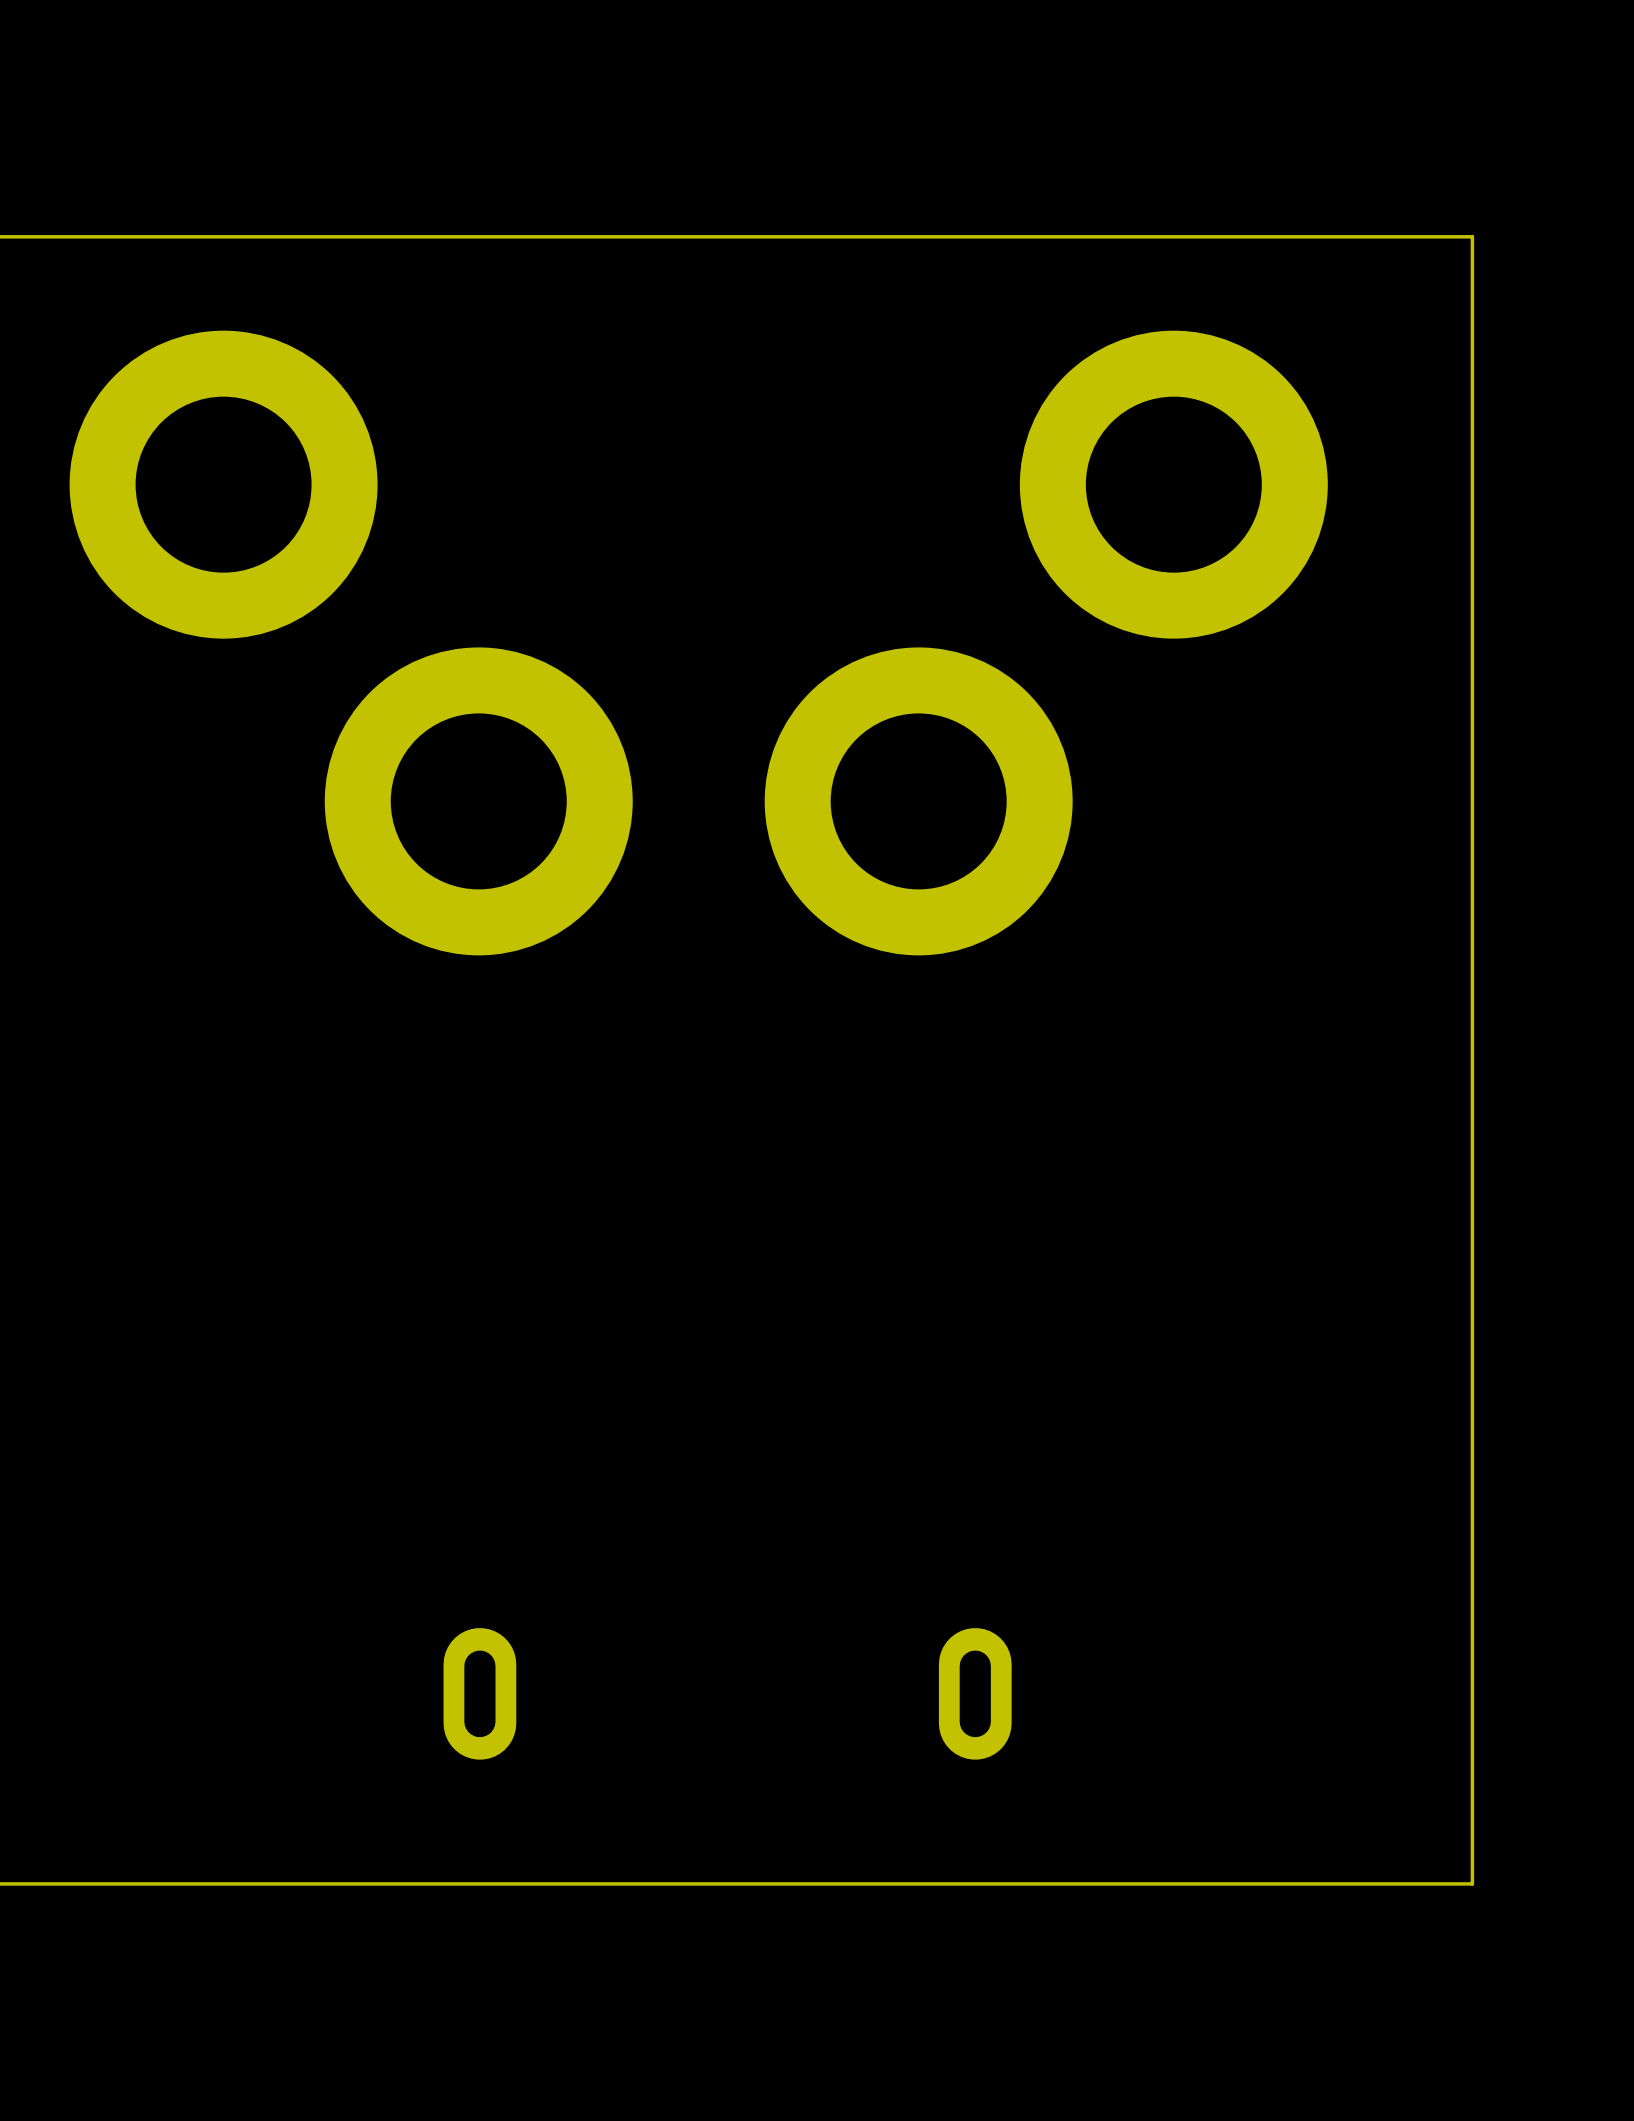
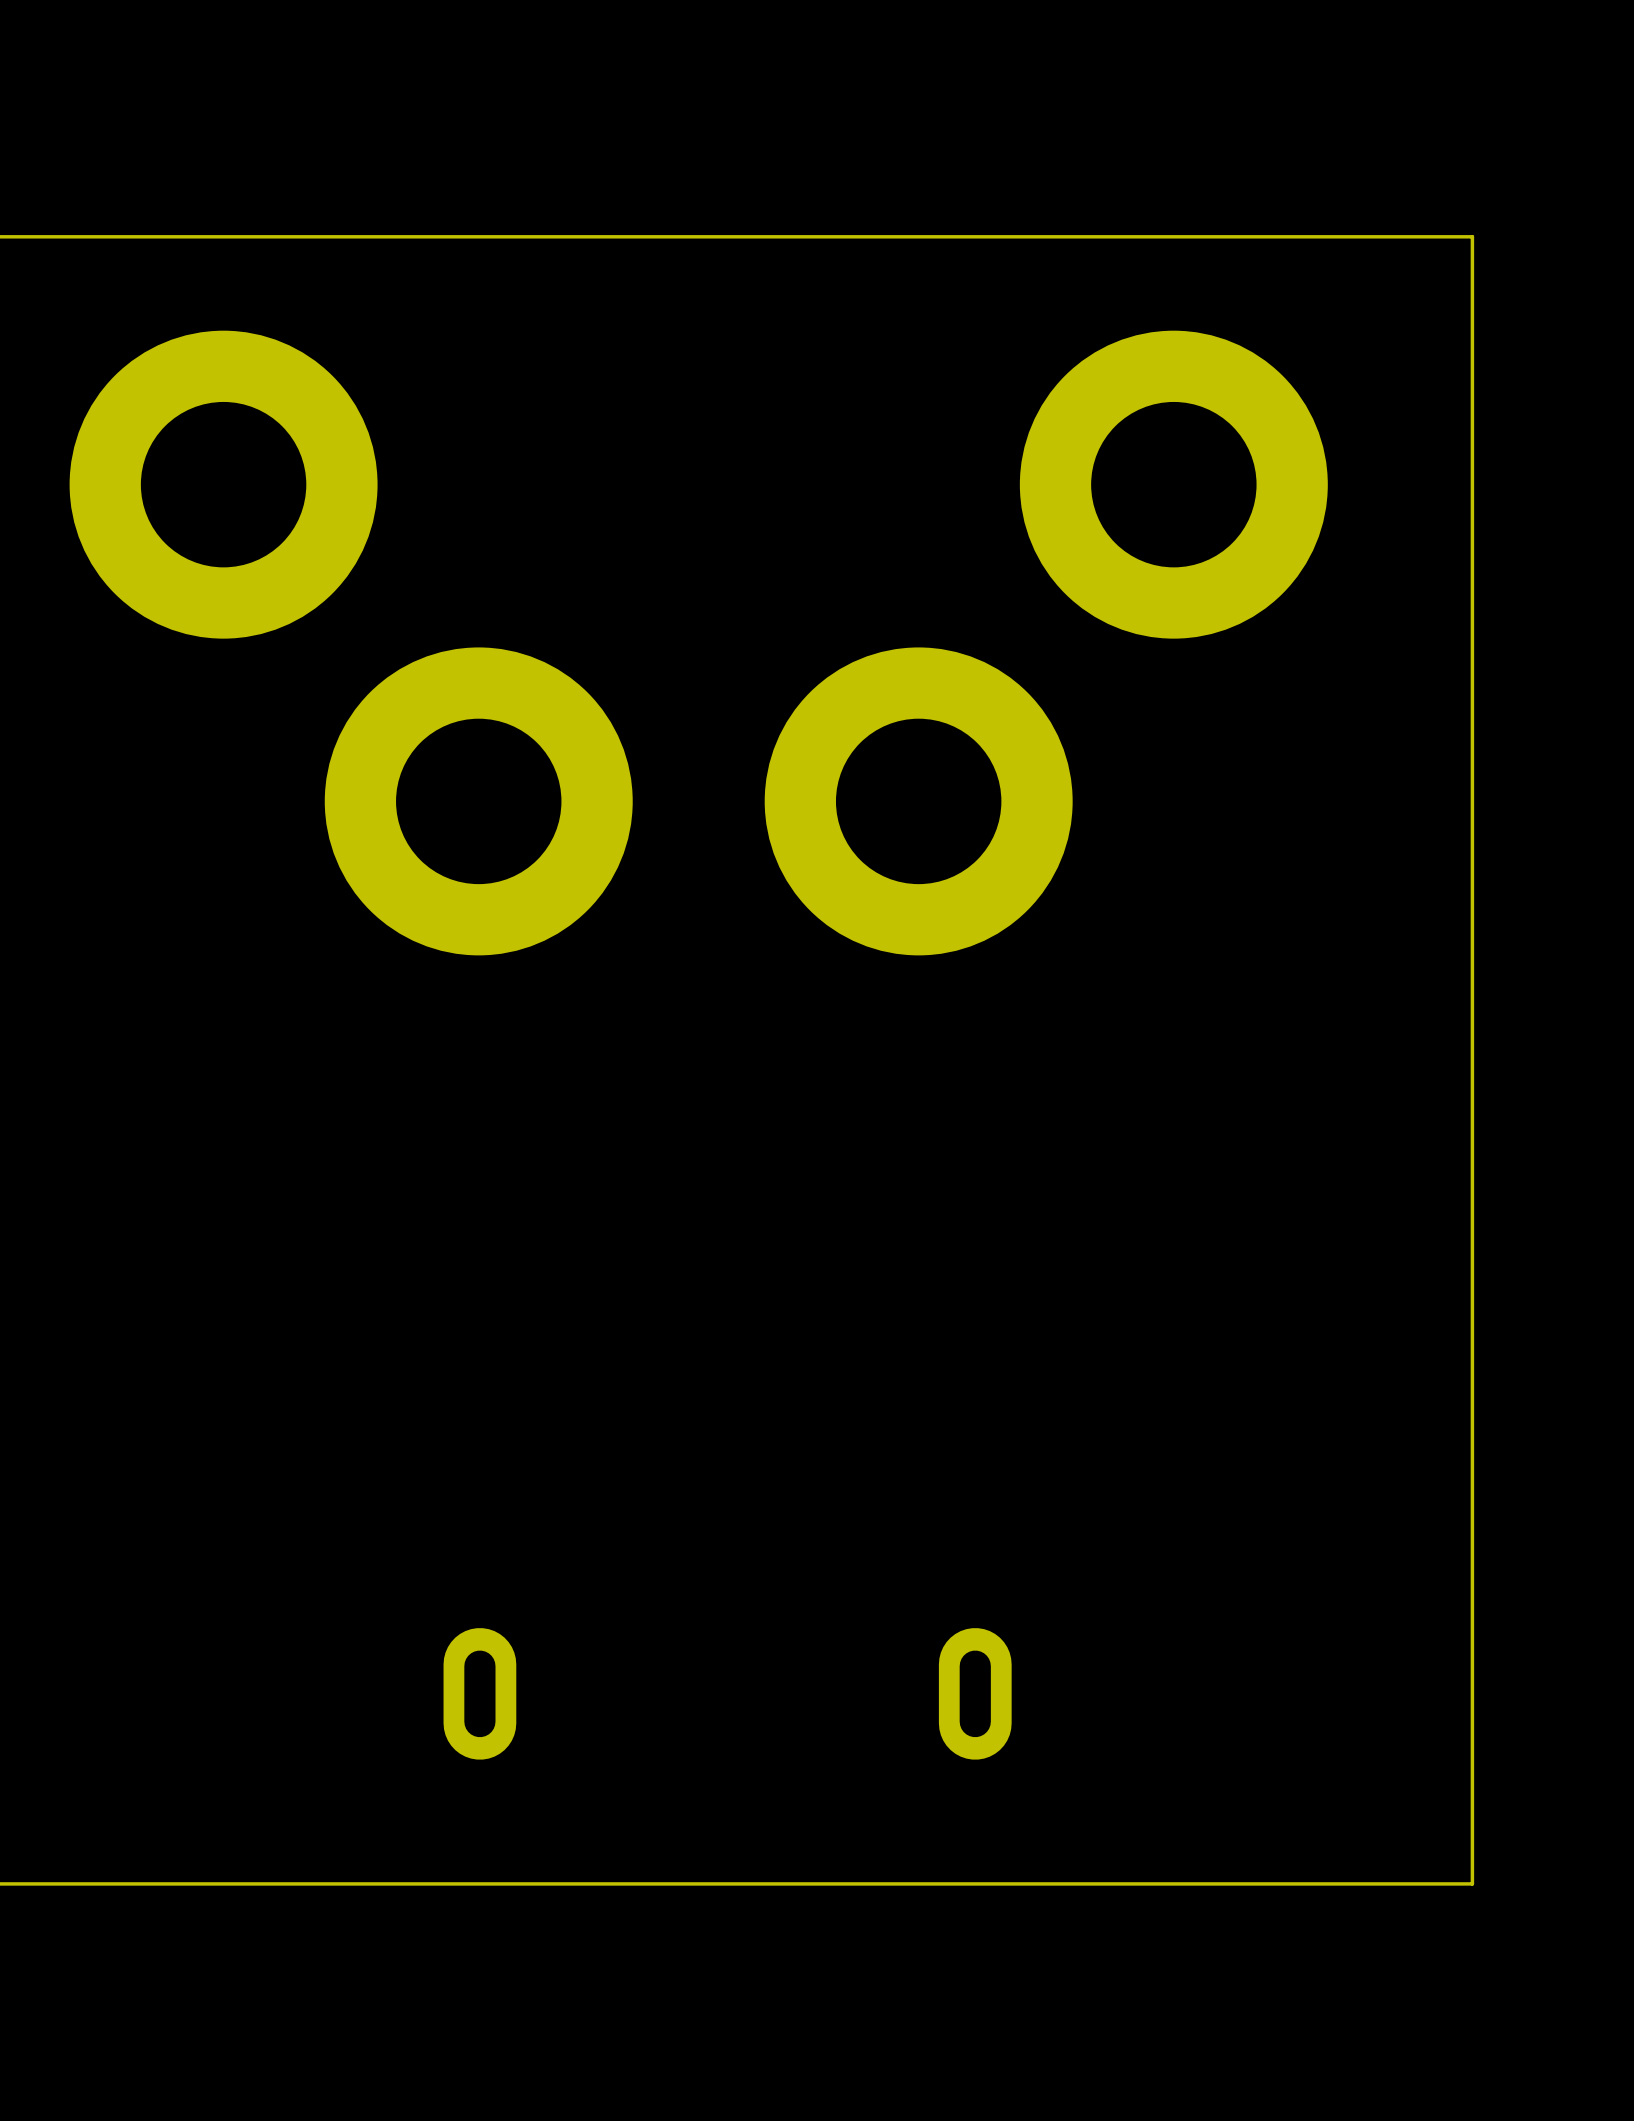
part footprint: [69, 330, 1328, 956] -> [69, 330, 1328, 956]

